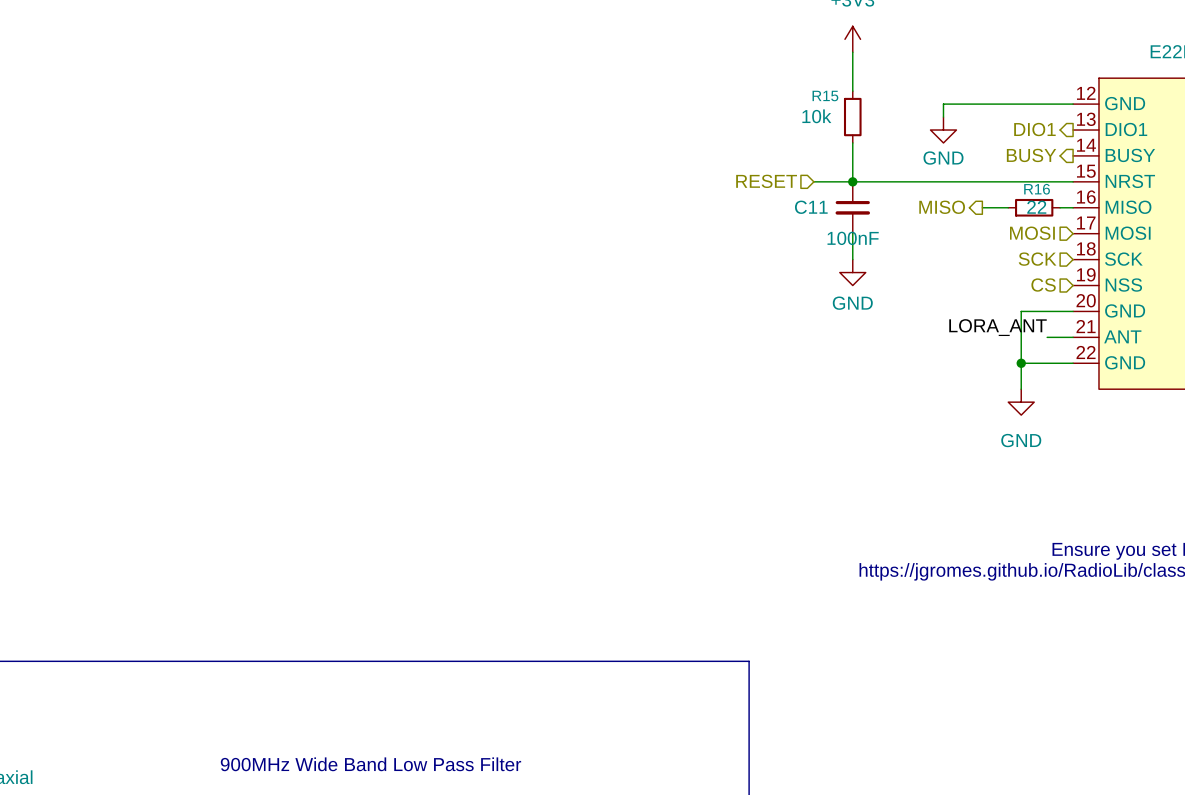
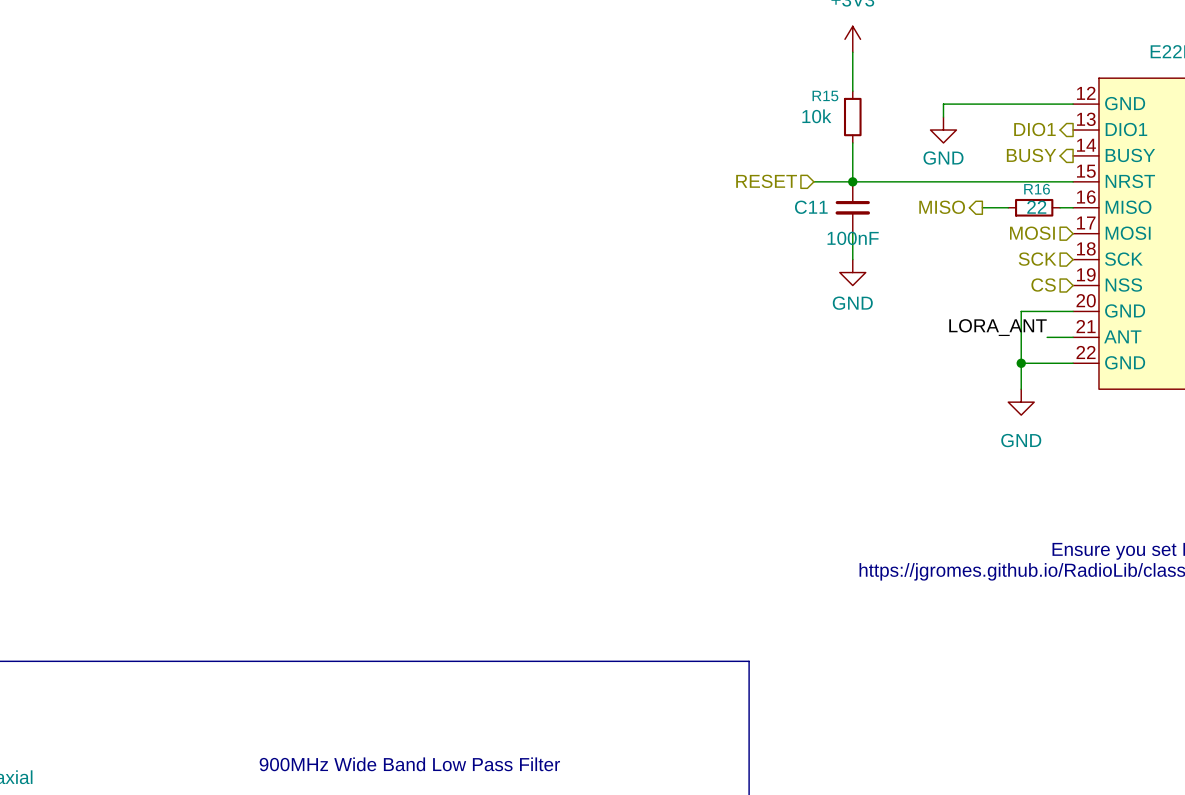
text position: 900MHz Wide Band Low Pass Filter (370, 764) -> 900MHz Wide Band Low Pass Filter (409, 764)

